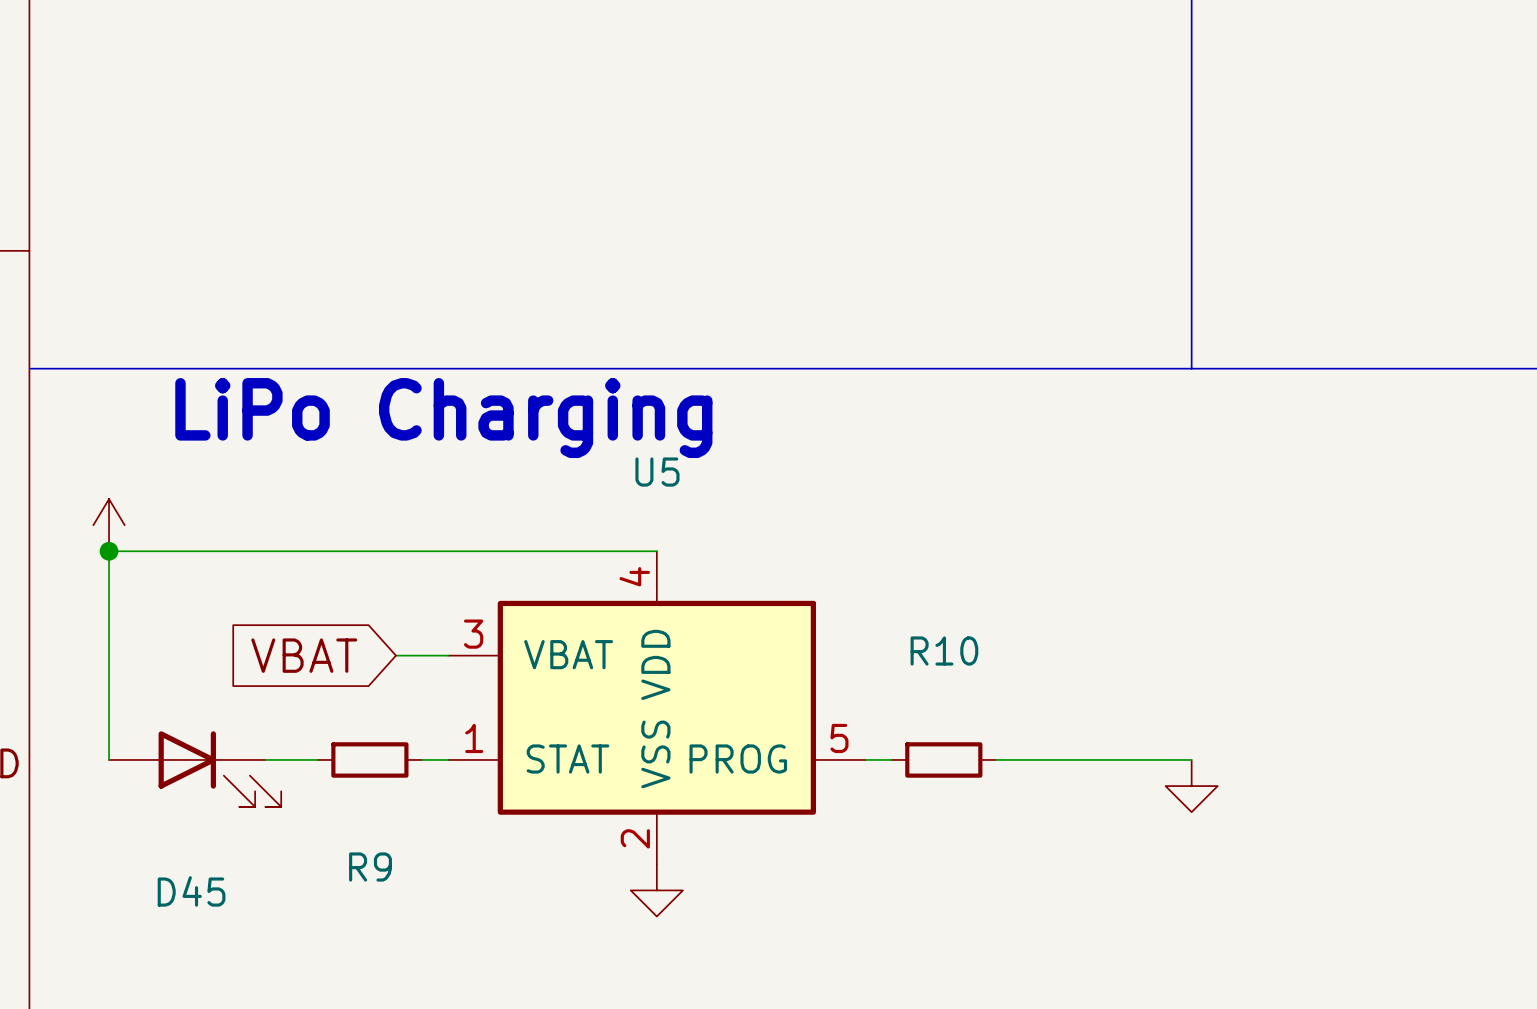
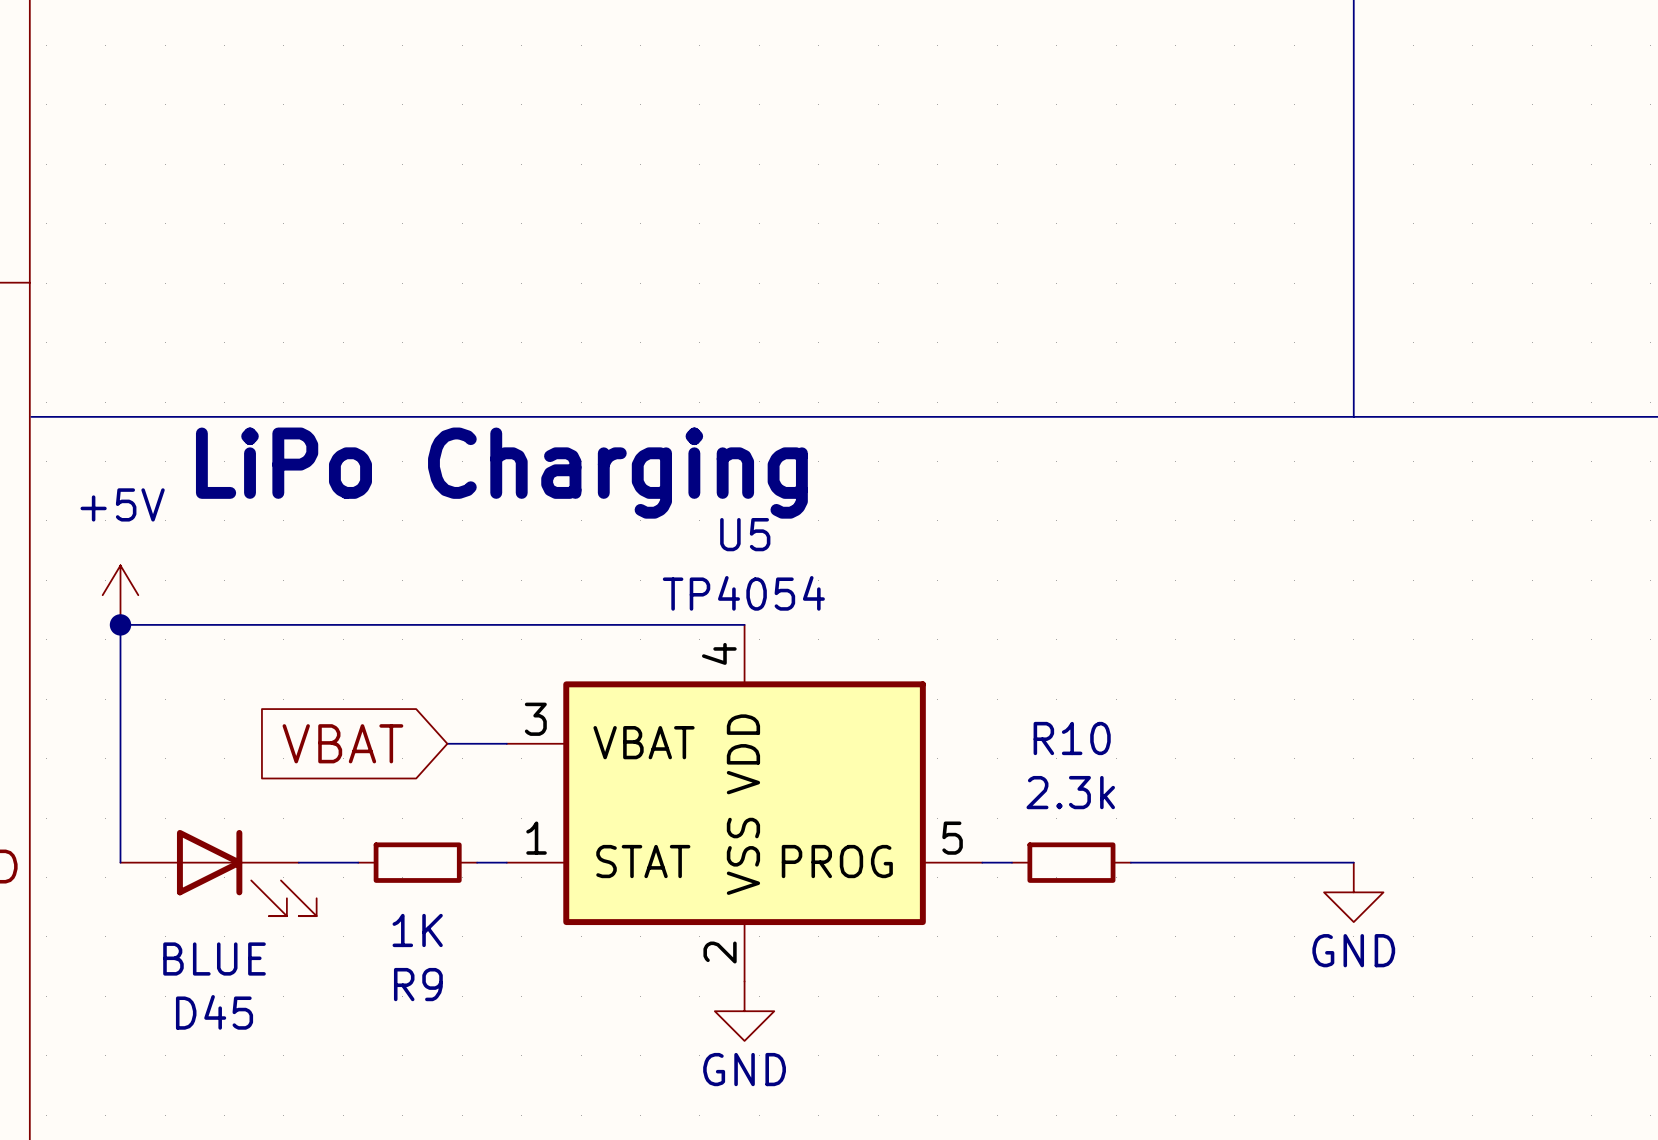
power symbol text: none -> +5V (122, 504)
U5 value: none -> TP4054 (743, 593)
R10 value: none -> 2.3k (1070, 792)
R9 value: none -> 1K (417, 930)
power symbol text: none -> GND (1353, 950)
D45 value: none -> BLUE (214, 959)
power symbol text: none -> GND (744, 1069)

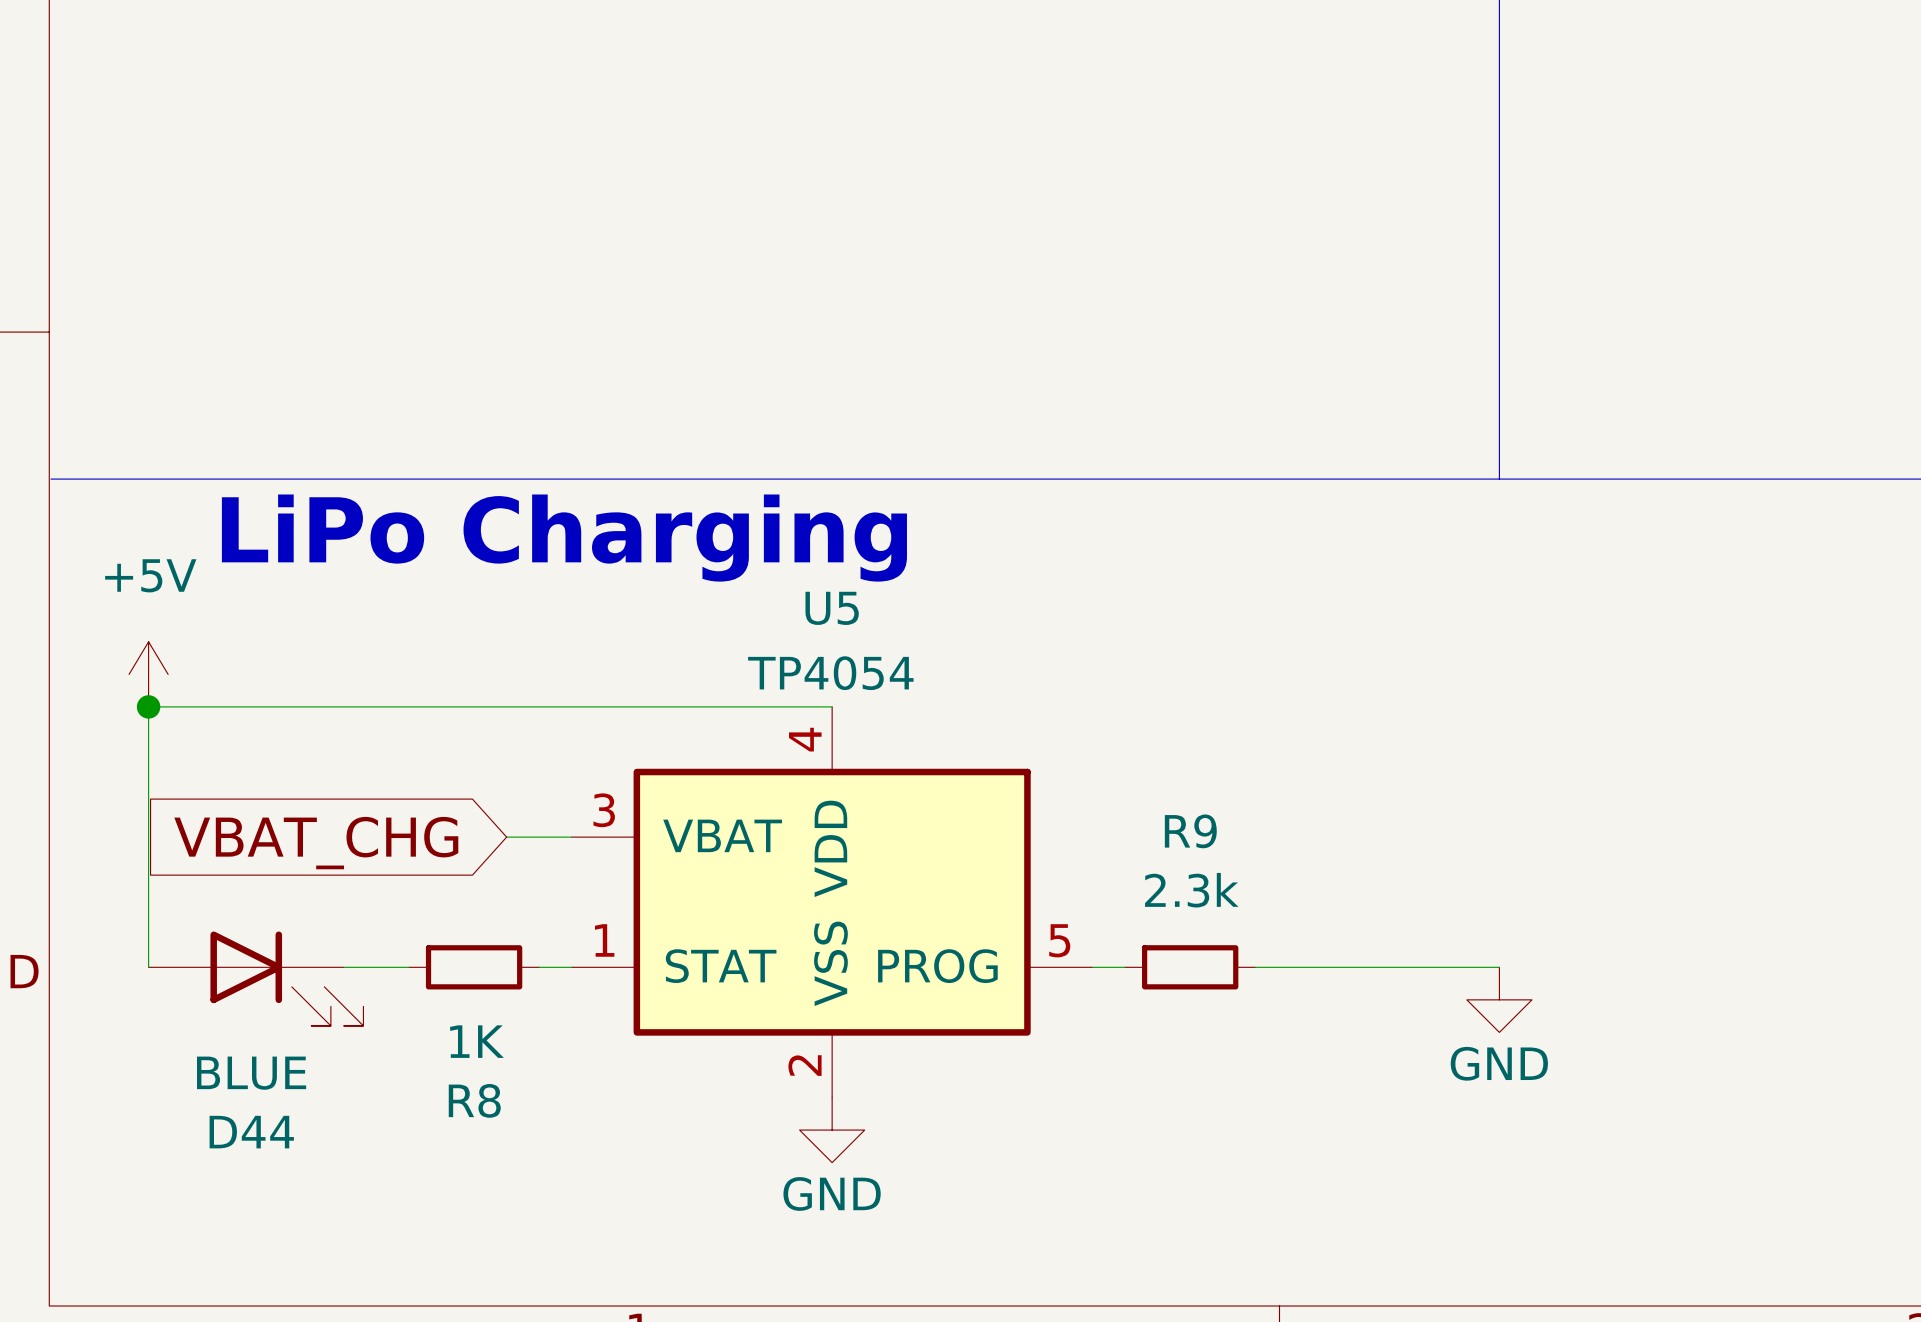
R10 name: R10 (1072, 738) -> R9 (1190, 831)
global label: VBAT (342, 743) -> VBAT_CHG (316, 843)
R9 name: R9 (418, 984) -> R8 (474, 1100)
D45 name: D45 (214, 1012) -> D44 (251, 1132)

